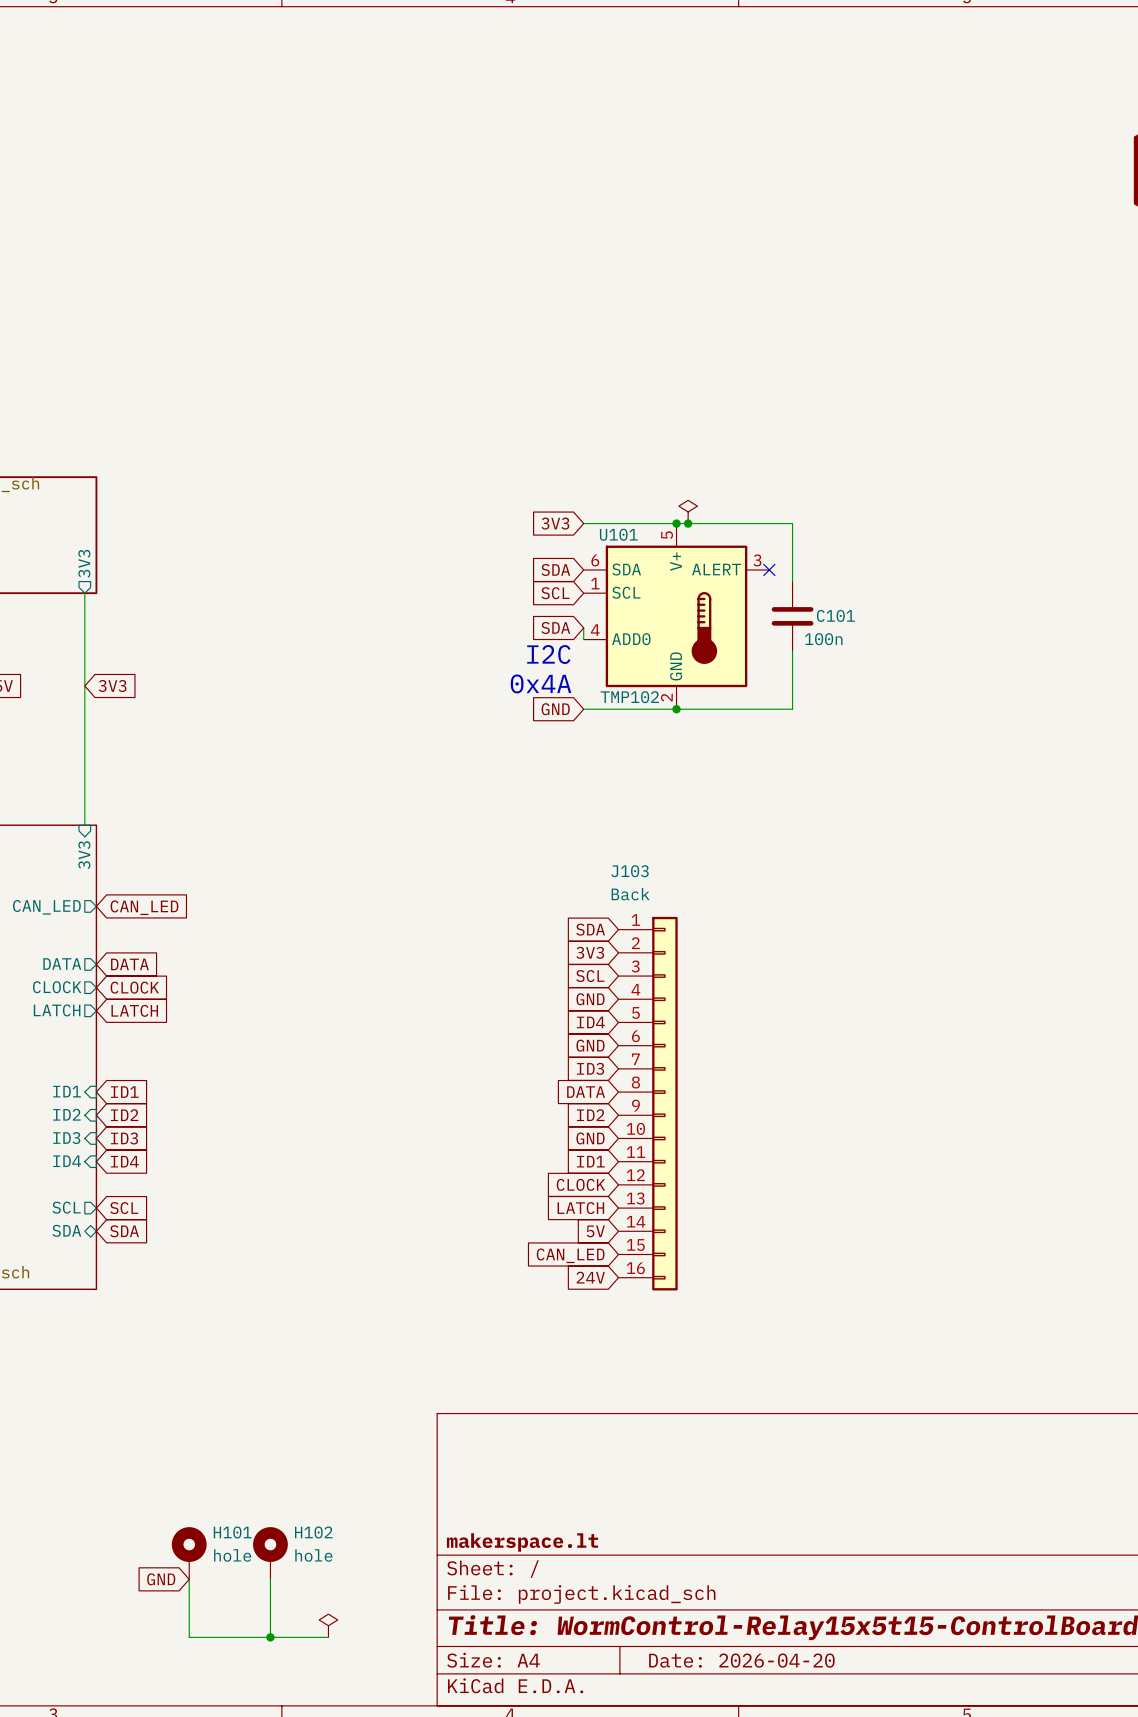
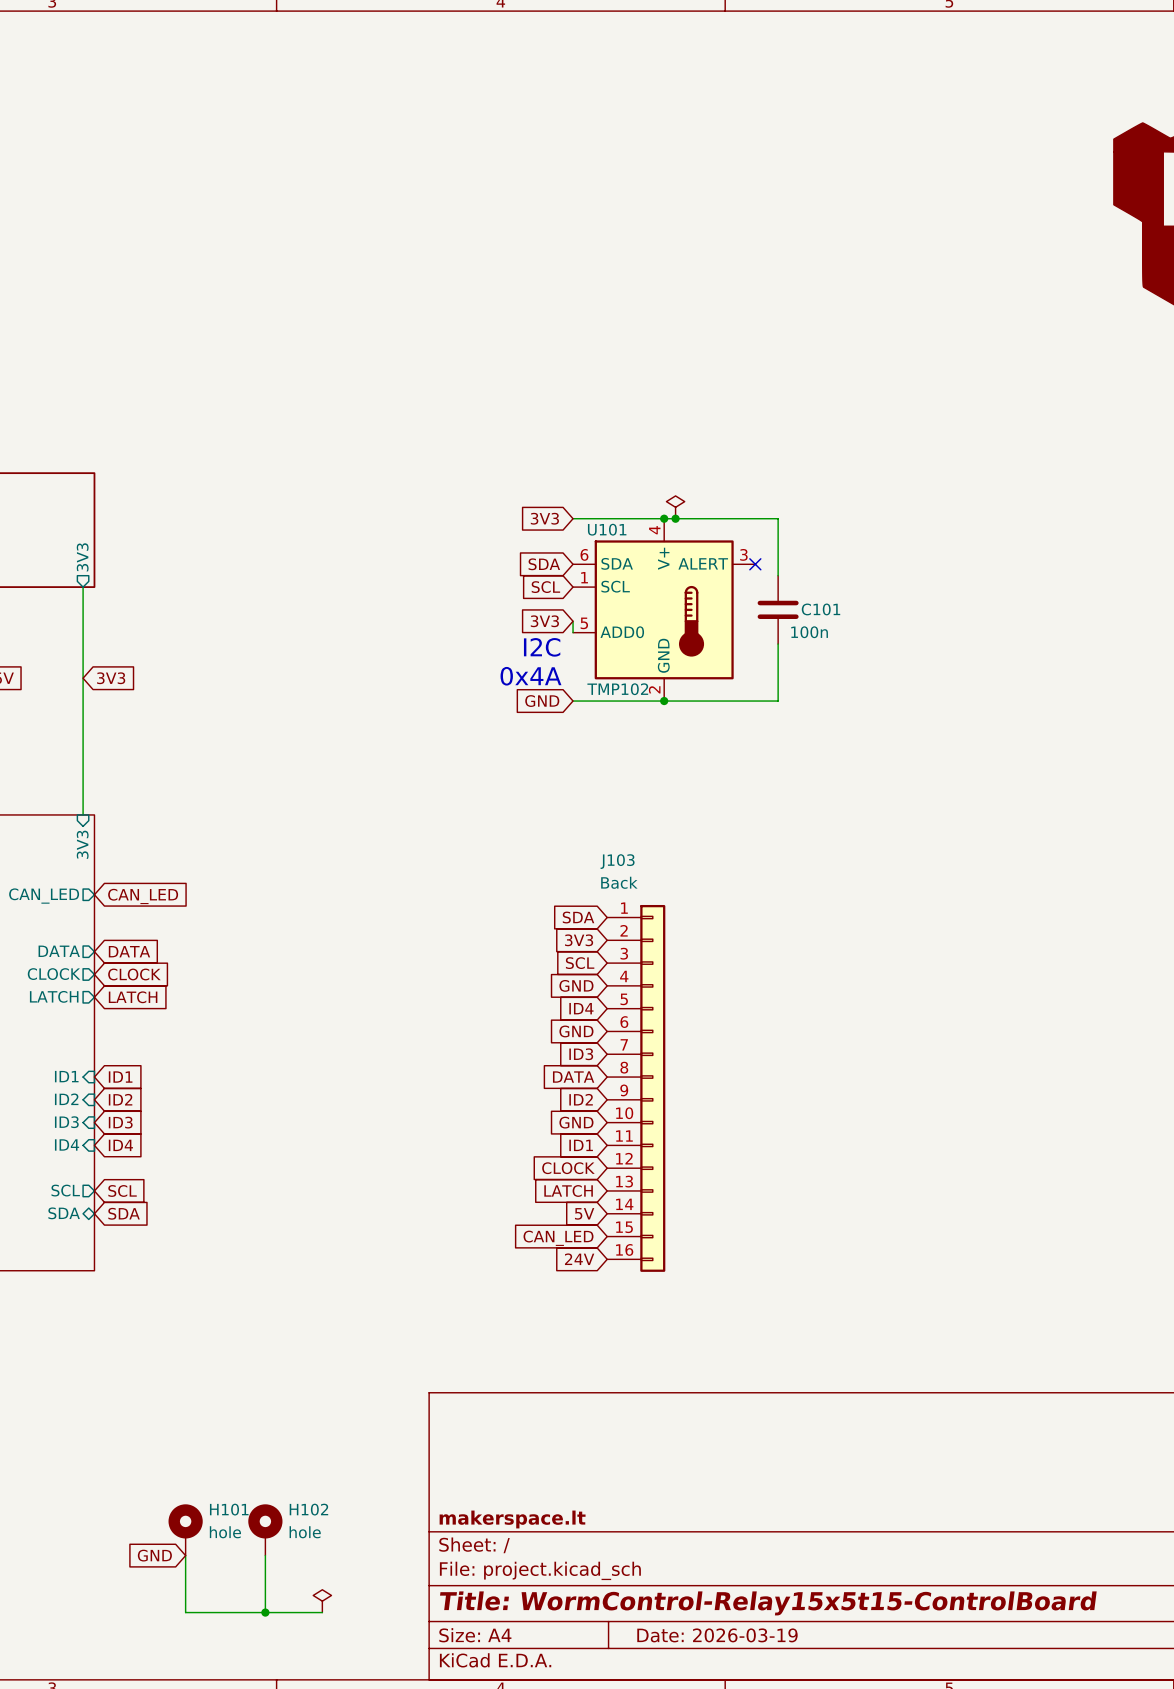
U101 pin number: 5 (667, 535) -> 4 (654, 530)
global label: SDA (555, 627) -> 3V3 (544, 621)
U101 pin number: 4 (595, 630) -> 5 (584, 623)
title block: Date: 2026-04-20 (741, 1660) -> Date: 2026-03-19 (717, 1635)

